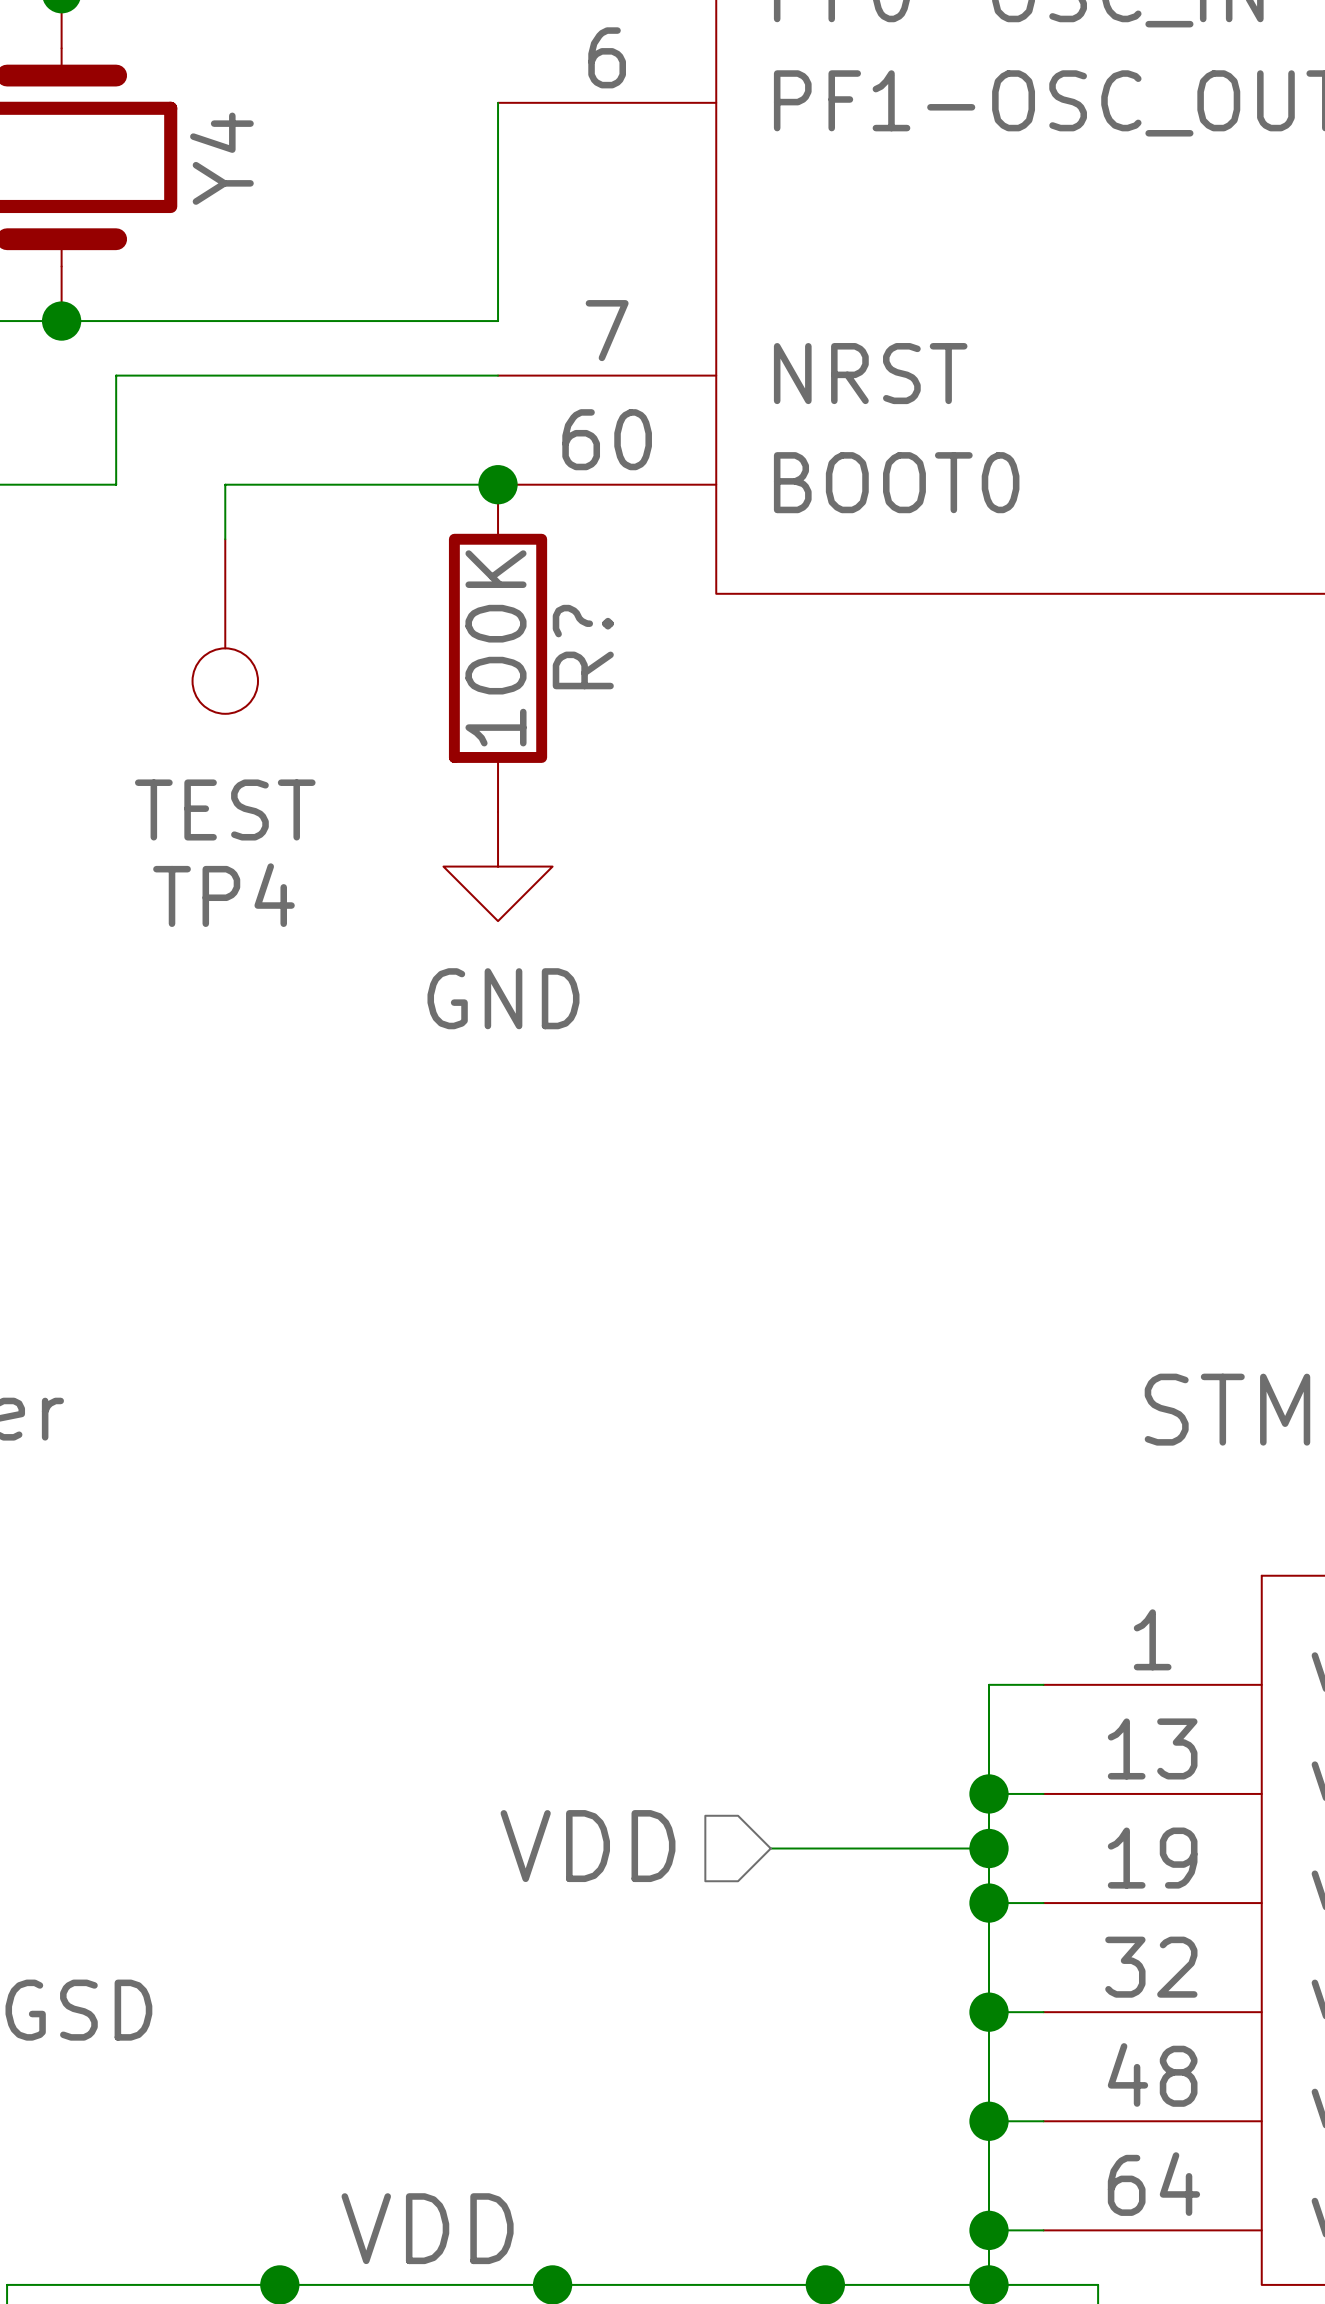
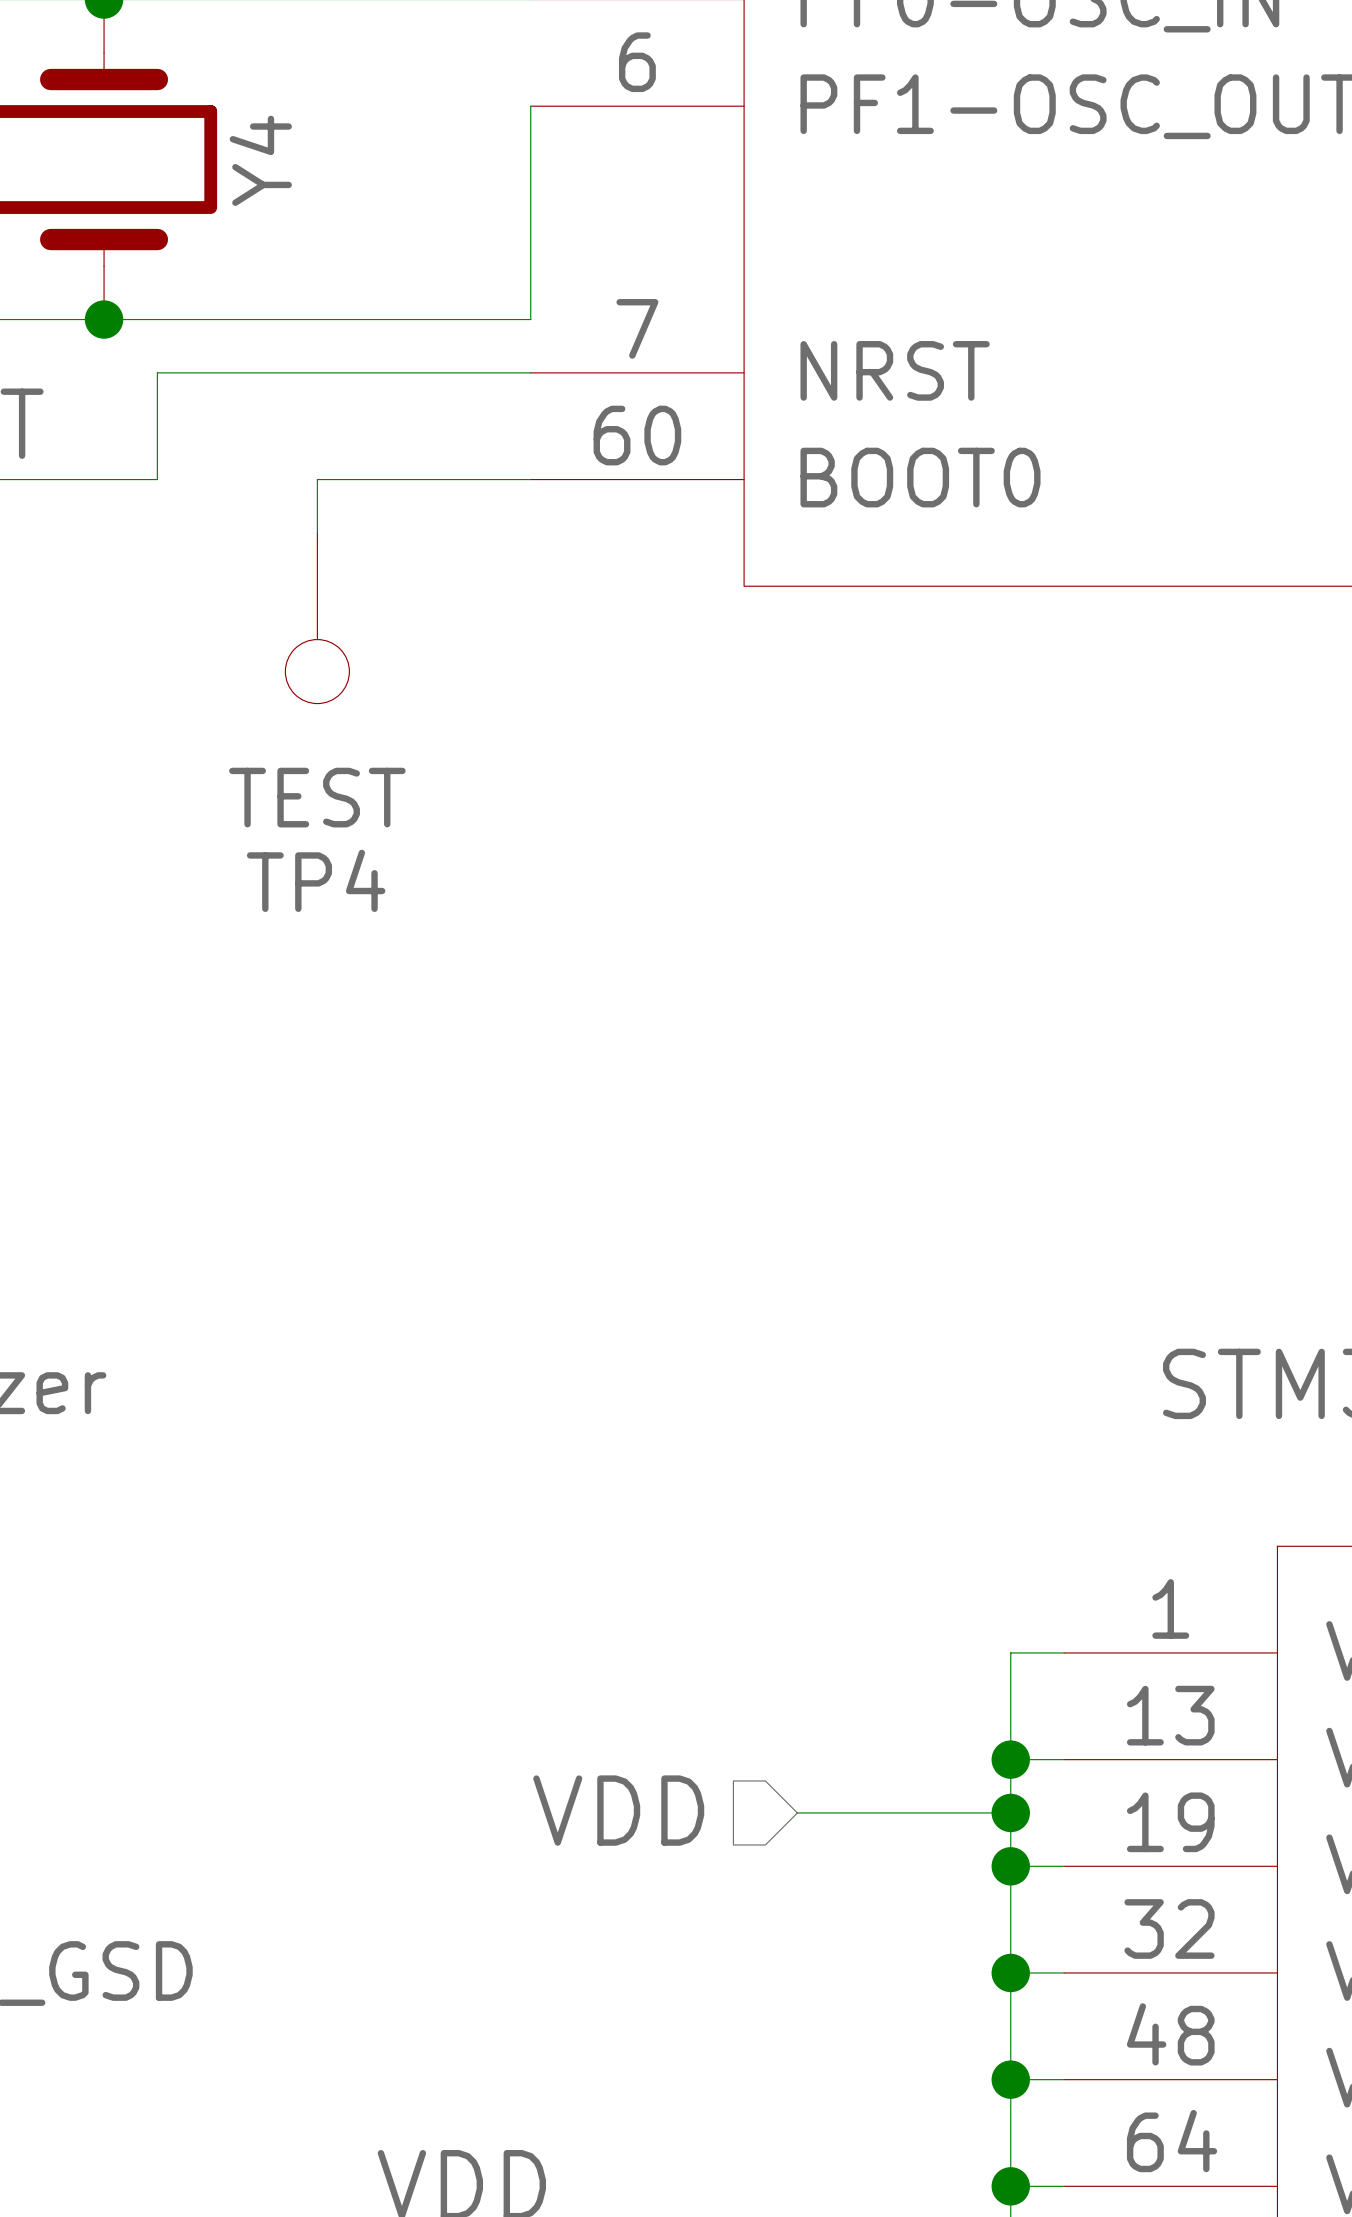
wire: (279, 484) (225, 484) (225, 539) -> (317, 479) (317, 532)
junction: (498, 484) -> none
TP4 position: (225, 626) -> (317, 618)
R?: 100K (498, 648) -> none
power symbol: GND (498, 866) -> none

